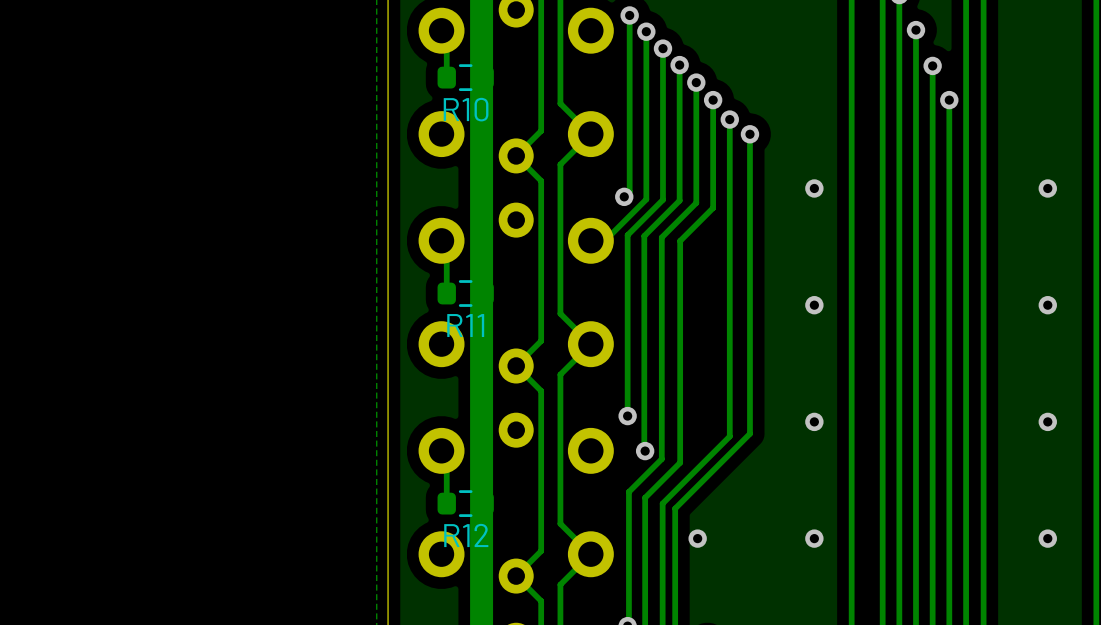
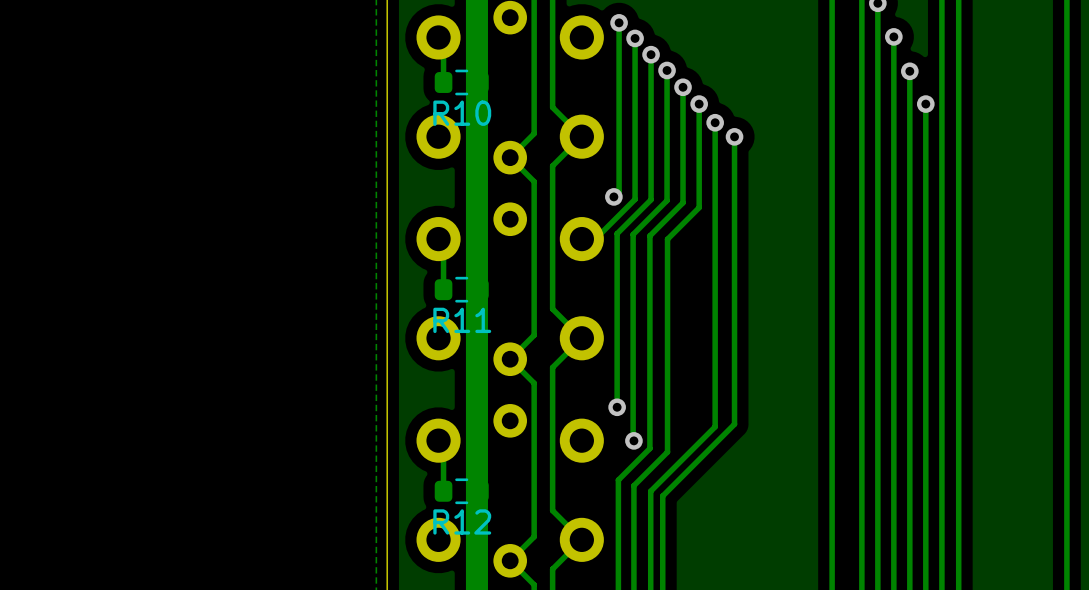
via: (814, 188) -> none
via: (1047, 188) -> none
via: (814, 305) -> none
via: (1047, 305) -> none
via: (814, 421) -> none
via: (1047, 421) -> none
via: (697, 538) -> none
via: (814, 538) -> none
via: (1047, 538) -> none

